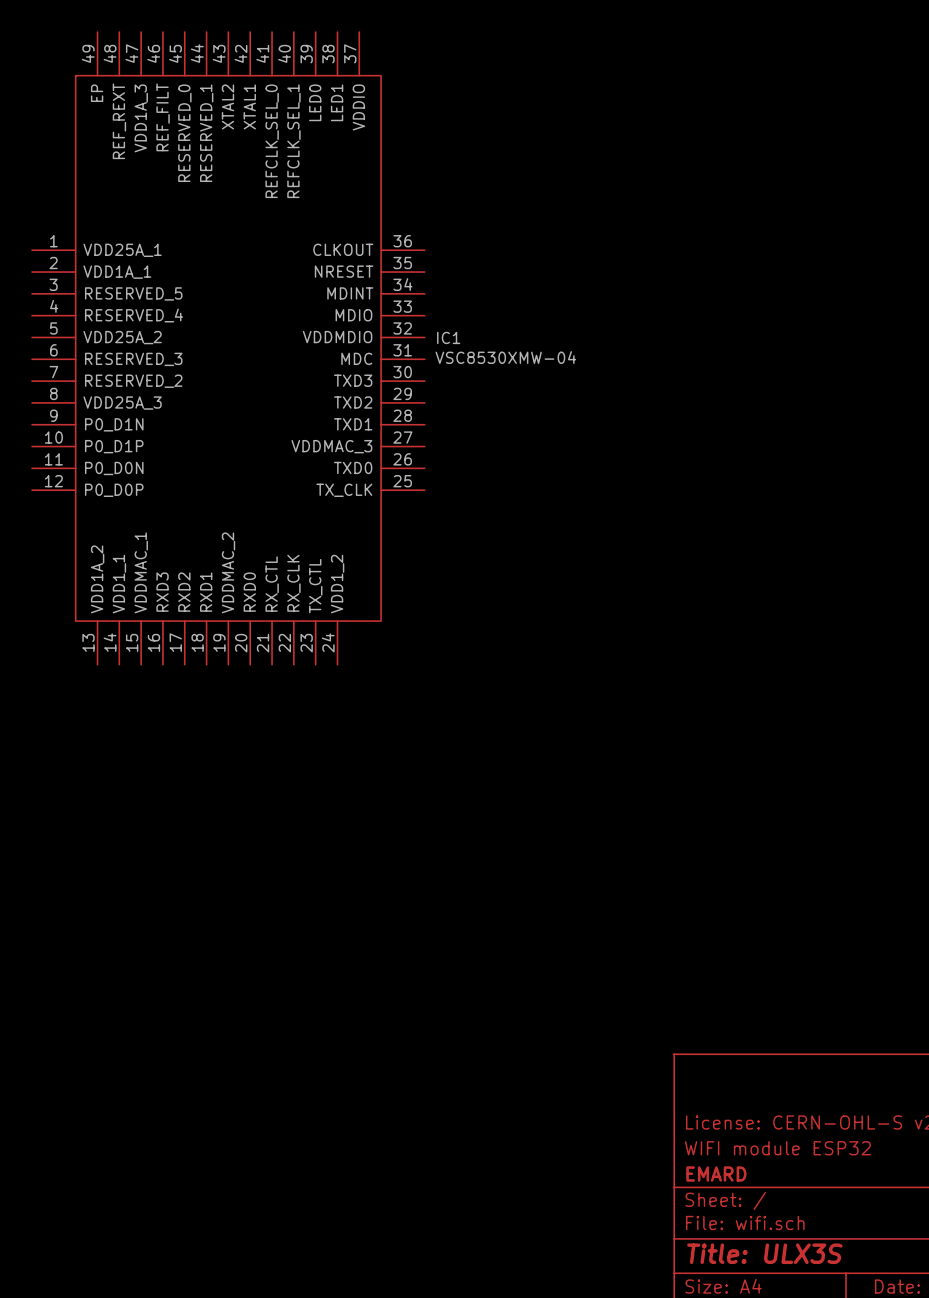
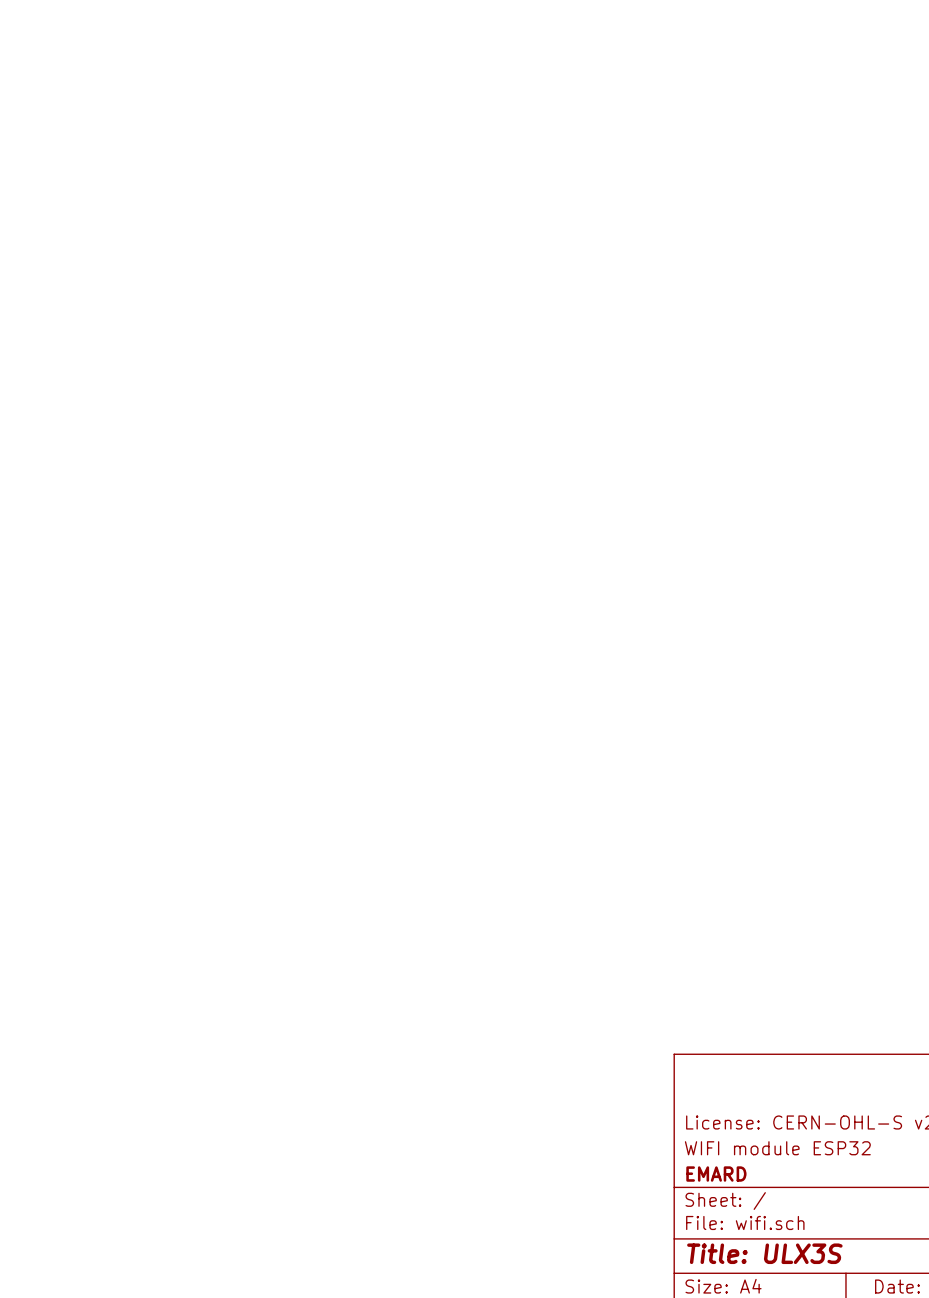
IC1: VSC8530XMW-04 (228, 348) -> none

